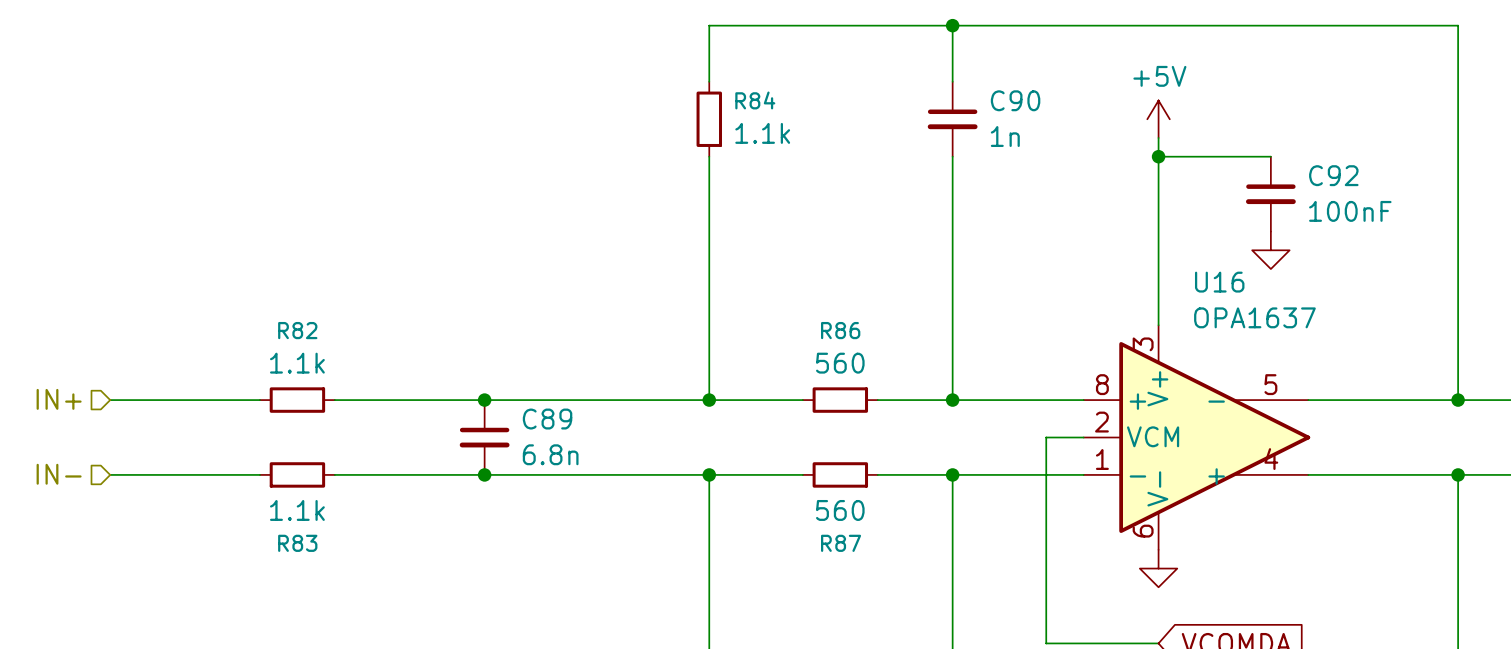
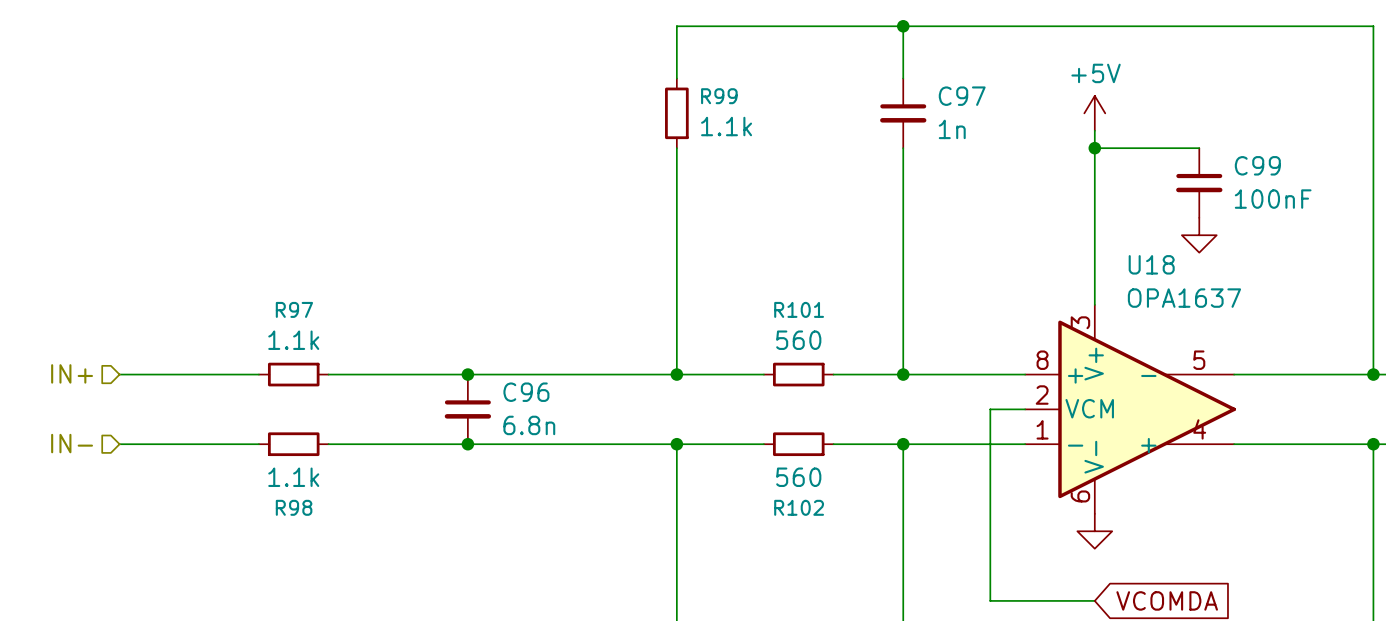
R84 name: R84 (755, 100) -> R99 (719, 96)
C90 name: C90 (1015, 100) -> C97 (962, 96)
C92 name: C92 (1333, 175) -> C99 (1257, 165)
U16 name: U16 (1219, 282) -> U18 (1151, 264)
R82 name: R82 (297, 330) -> R97 (294, 309)
R86 name: R86 (840, 330) -> R101 (799, 309)
C89 name: C89 (547, 419) -> C96 (526, 392)
R83 name: R83 (297, 543) -> R98 (294, 507)
R87 name: R87 (841, 543) -> R102 (799, 507)

